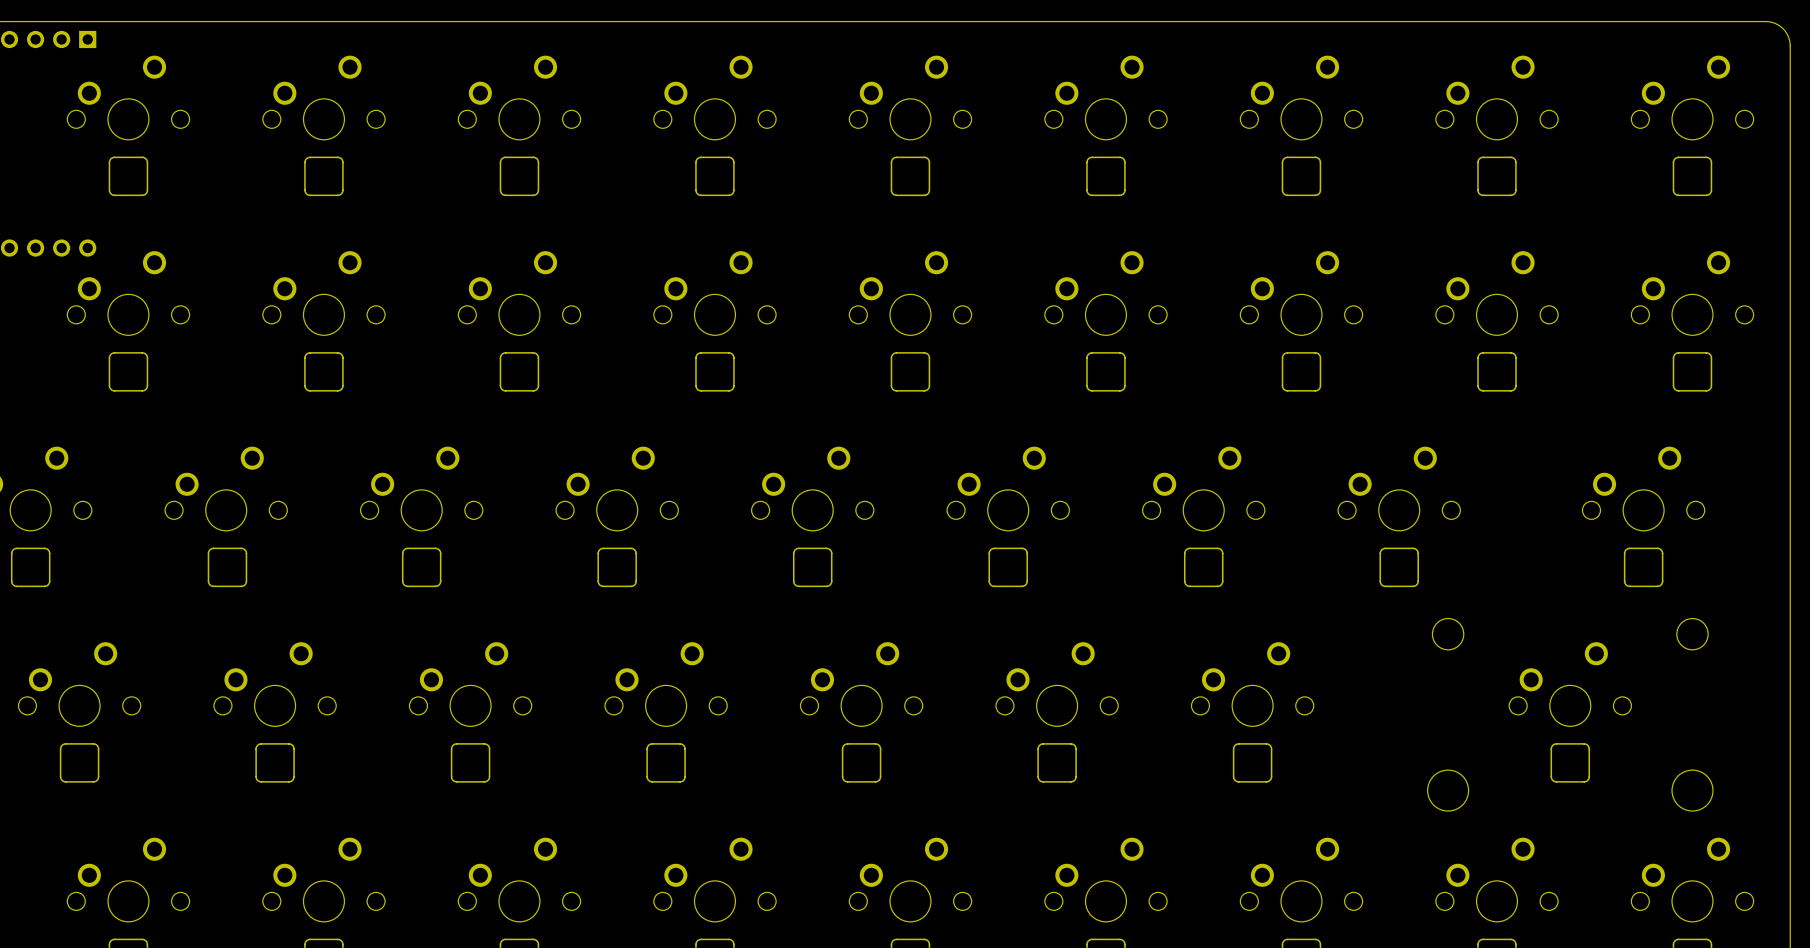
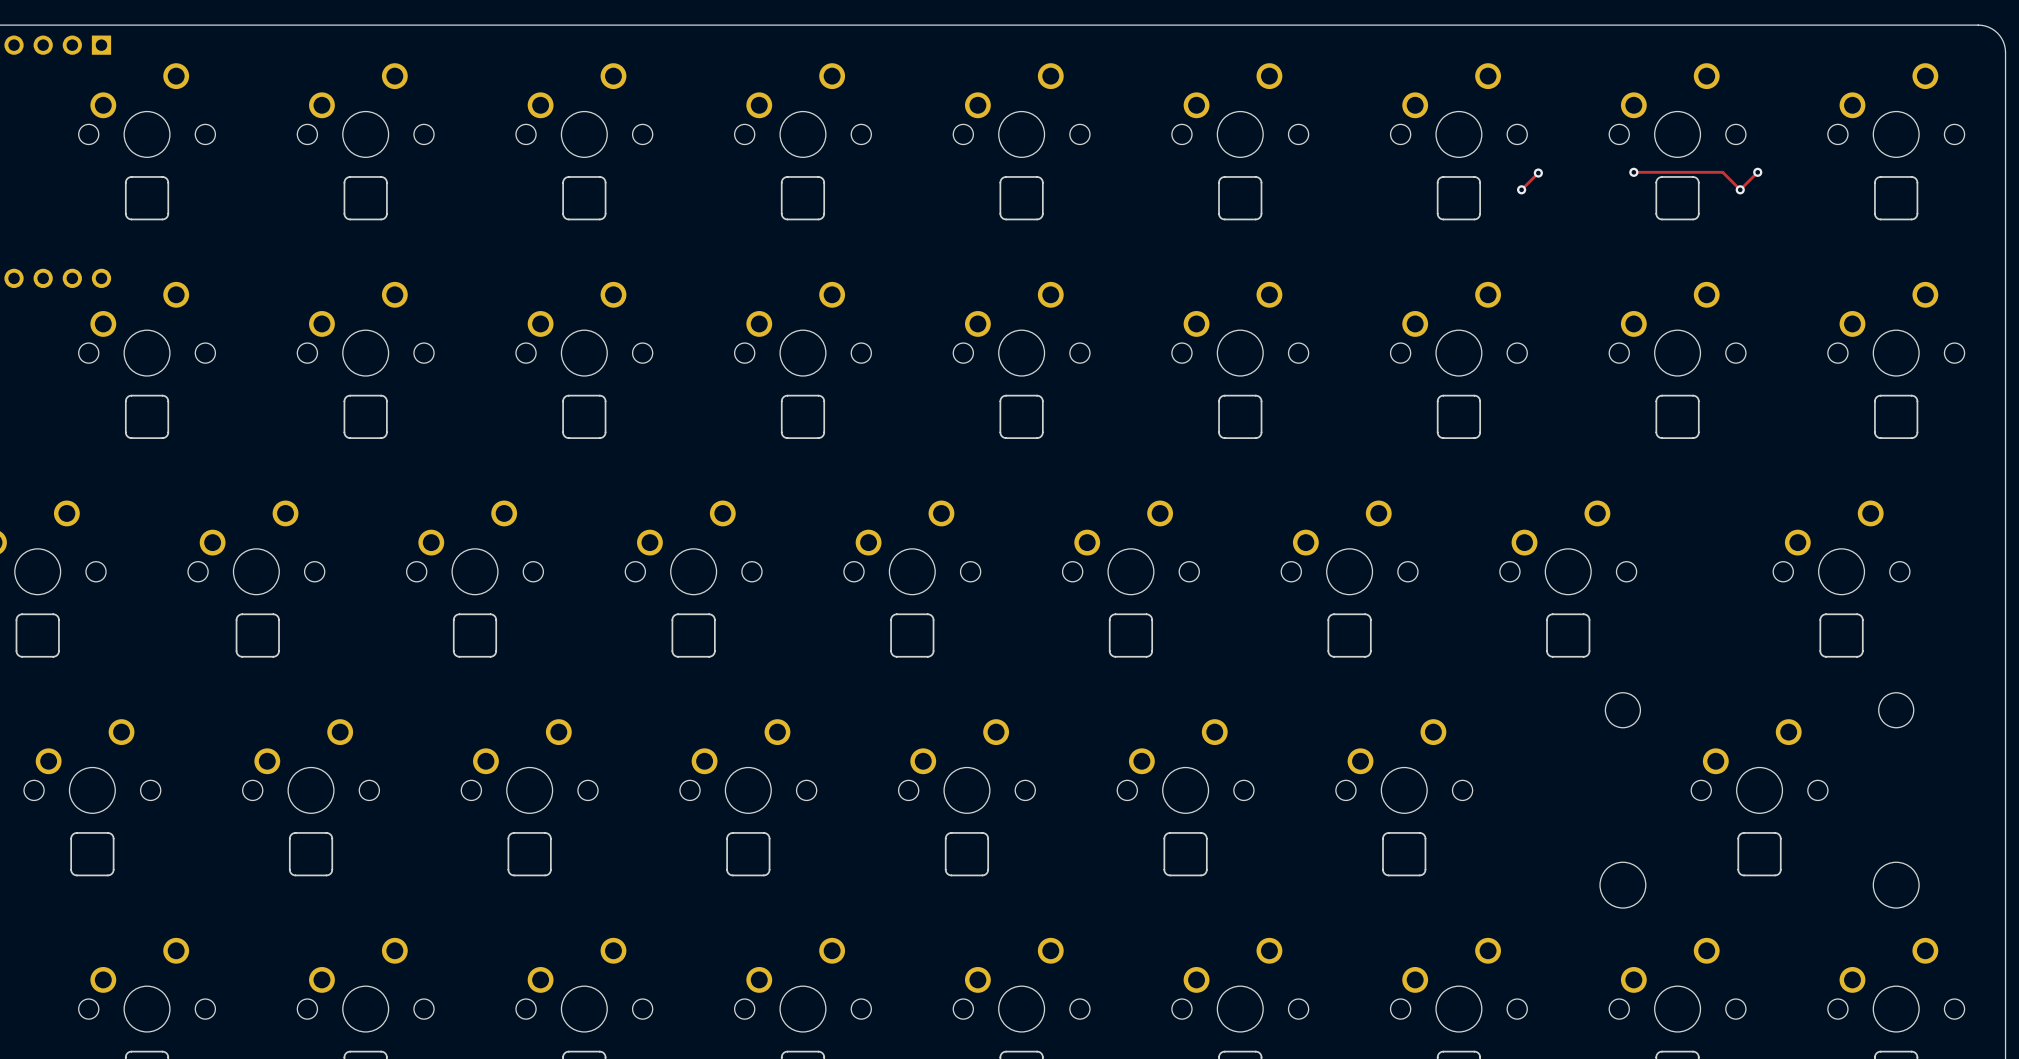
via: none -> (1538, 173)
track: none -> (1539, 172) (1521, 189)
track: none -> (1633, 172) (1722, 172) (1740, 189) (1757, 172)
via: none -> (1633, 172)
via: none -> (1757, 172)
via: none -> (1521, 189)
via: none -> (1740, 189)

